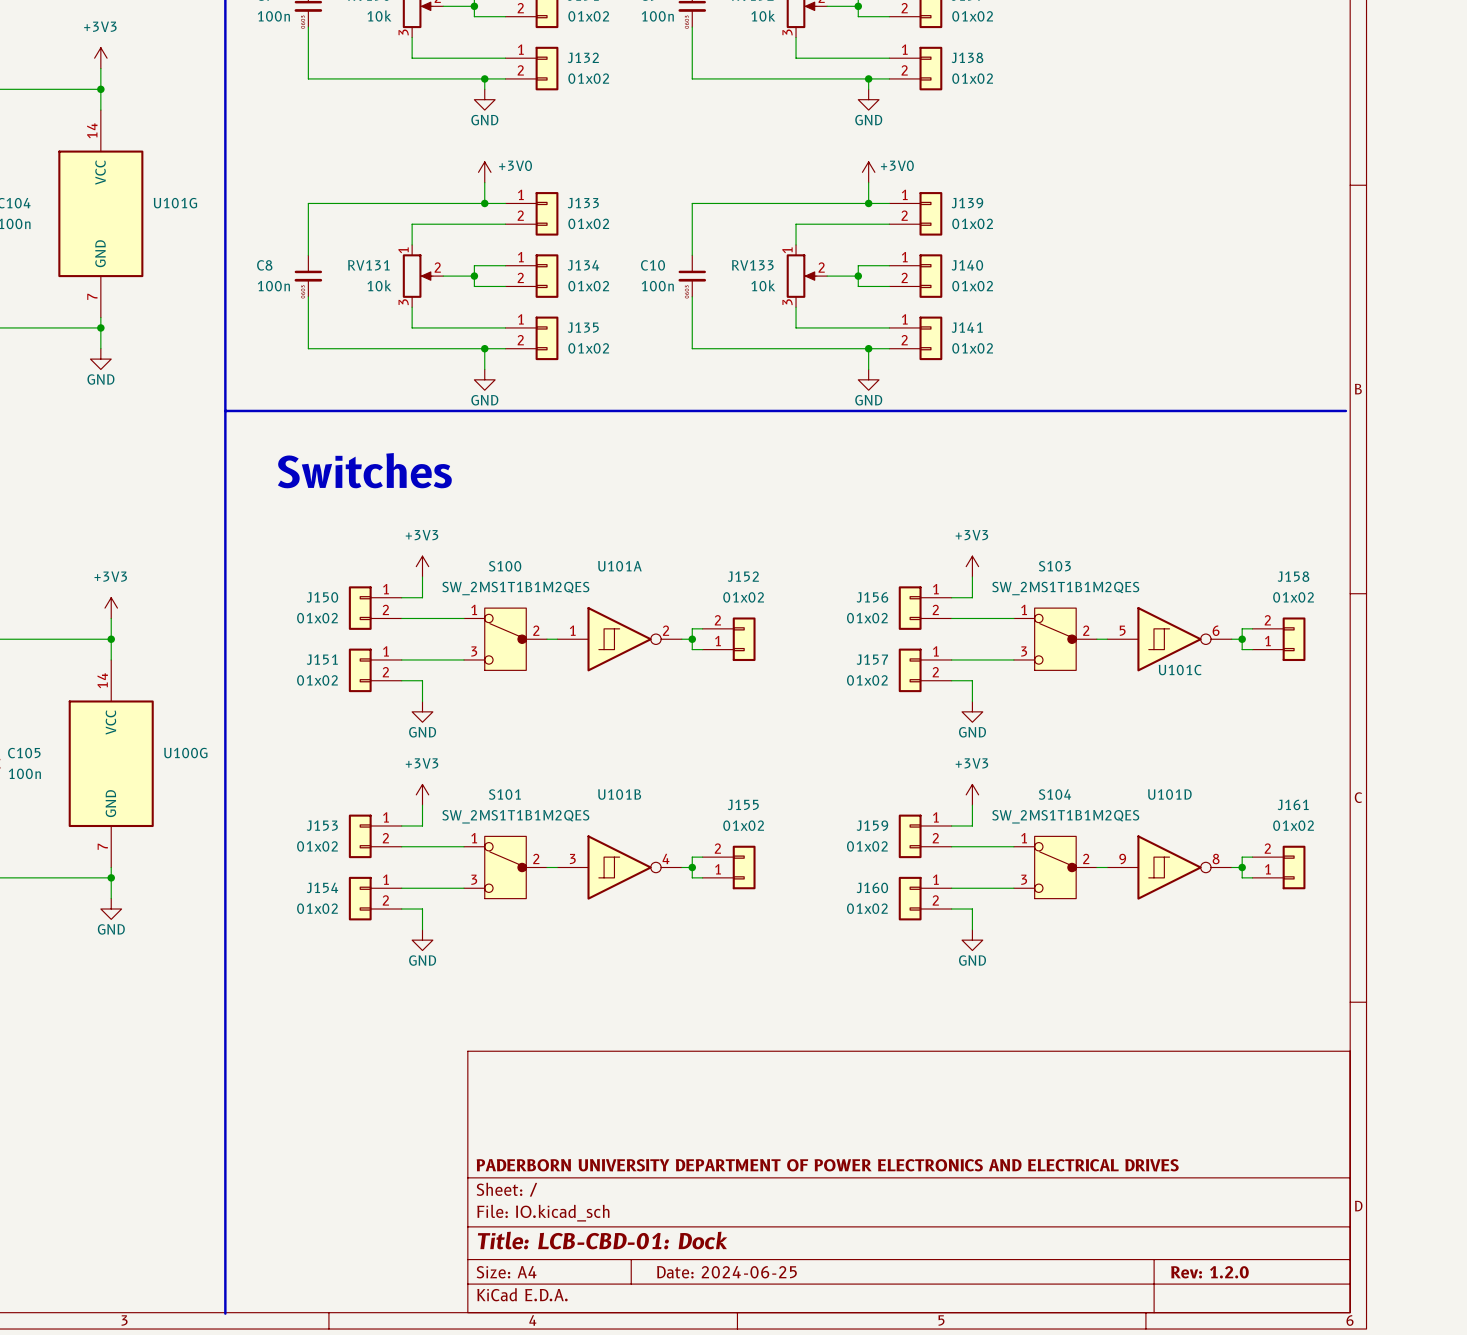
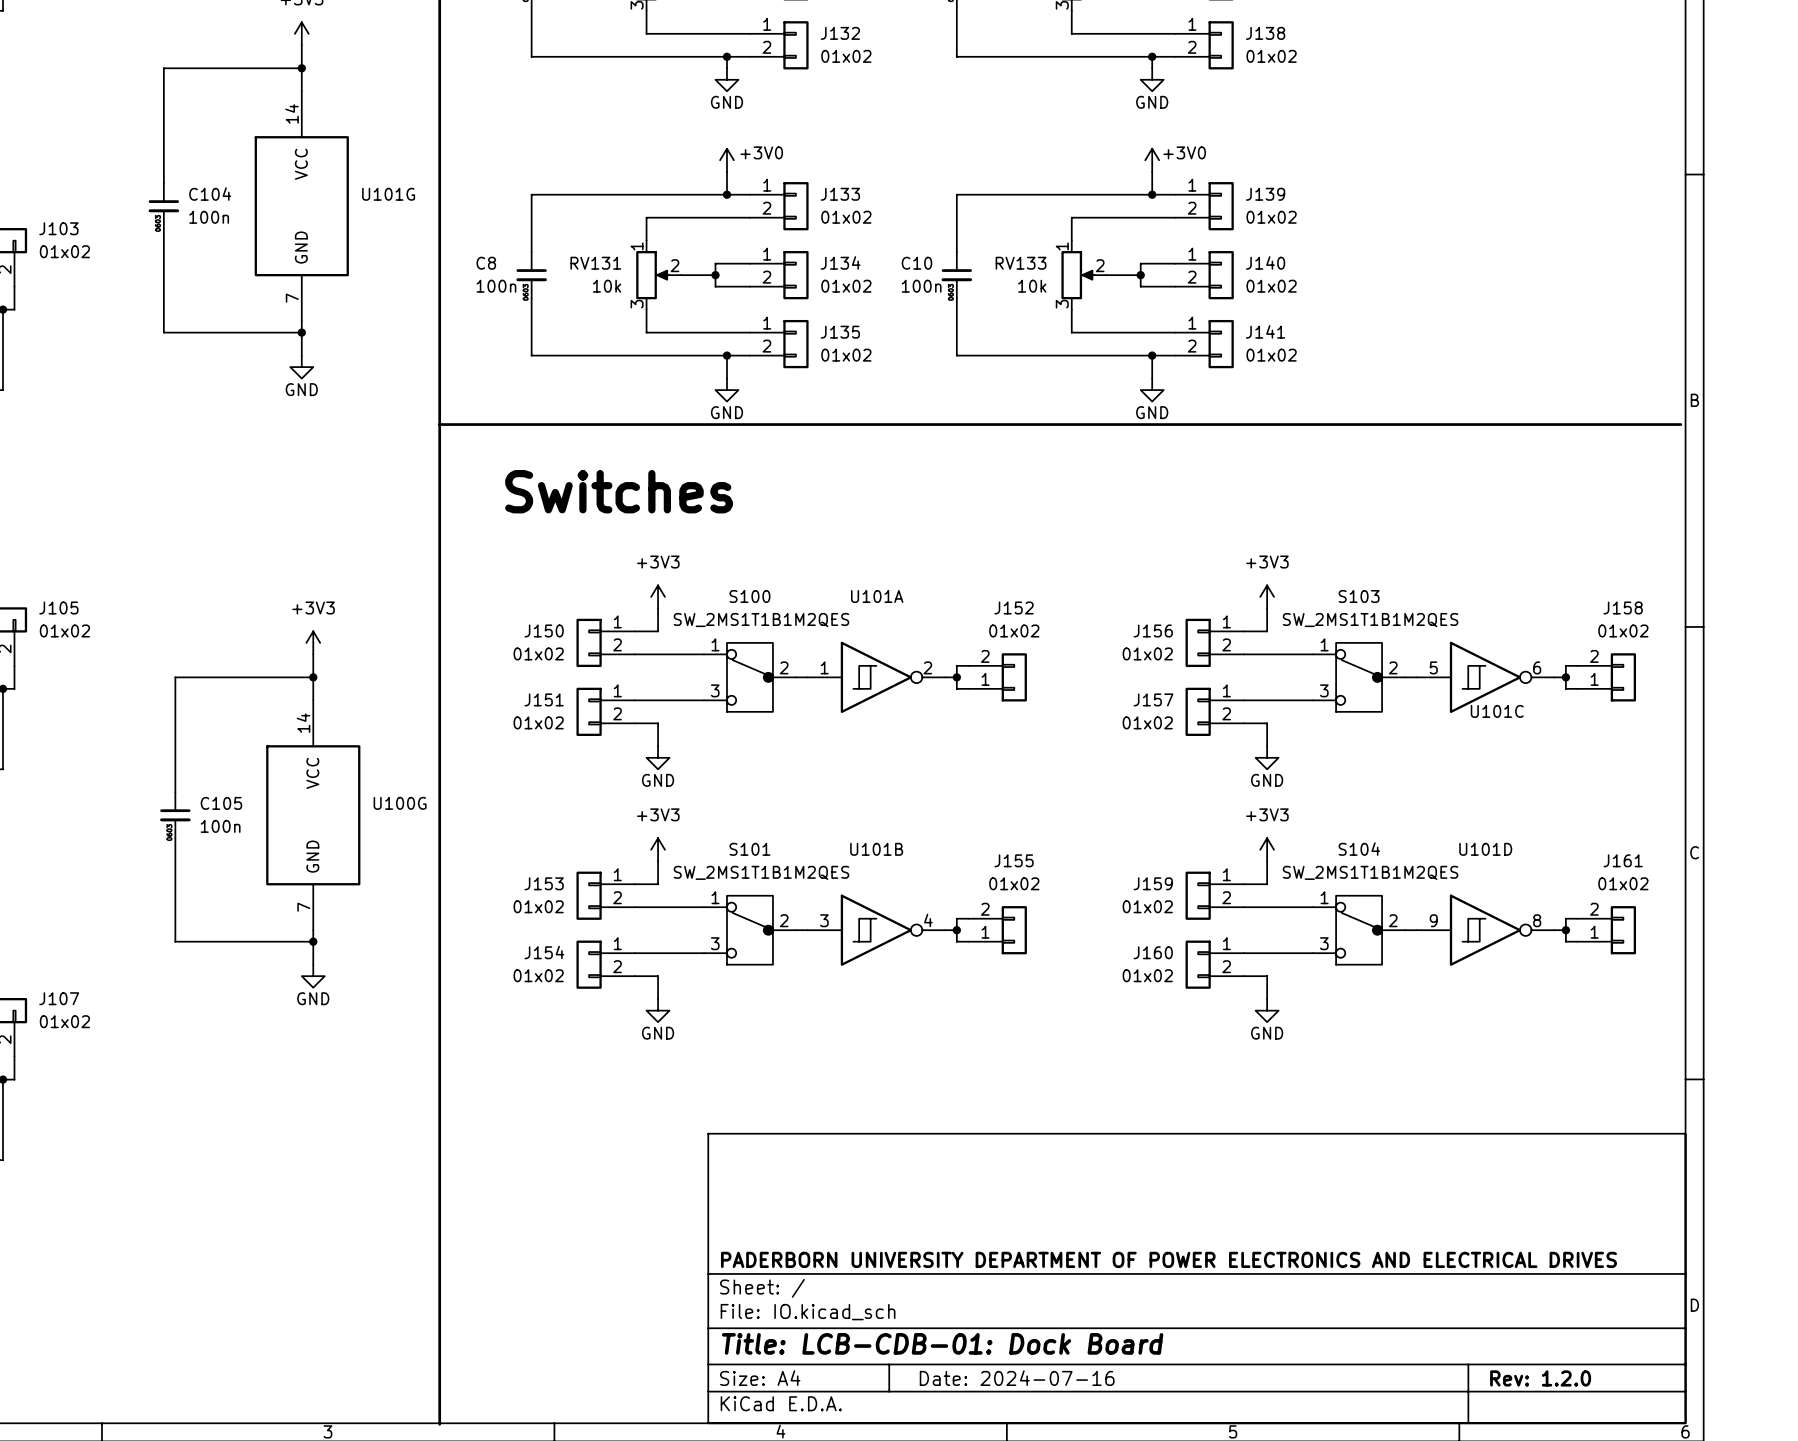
title block: Title: LCB-CBD-01: Dock (602, 1240) -> Title: LCB-CDB-01: Dock Board (942, 1343)
title block: Date: 2024-06-25 (726, 1272) -> Date: 2024-07-16 (1017, 1378)

